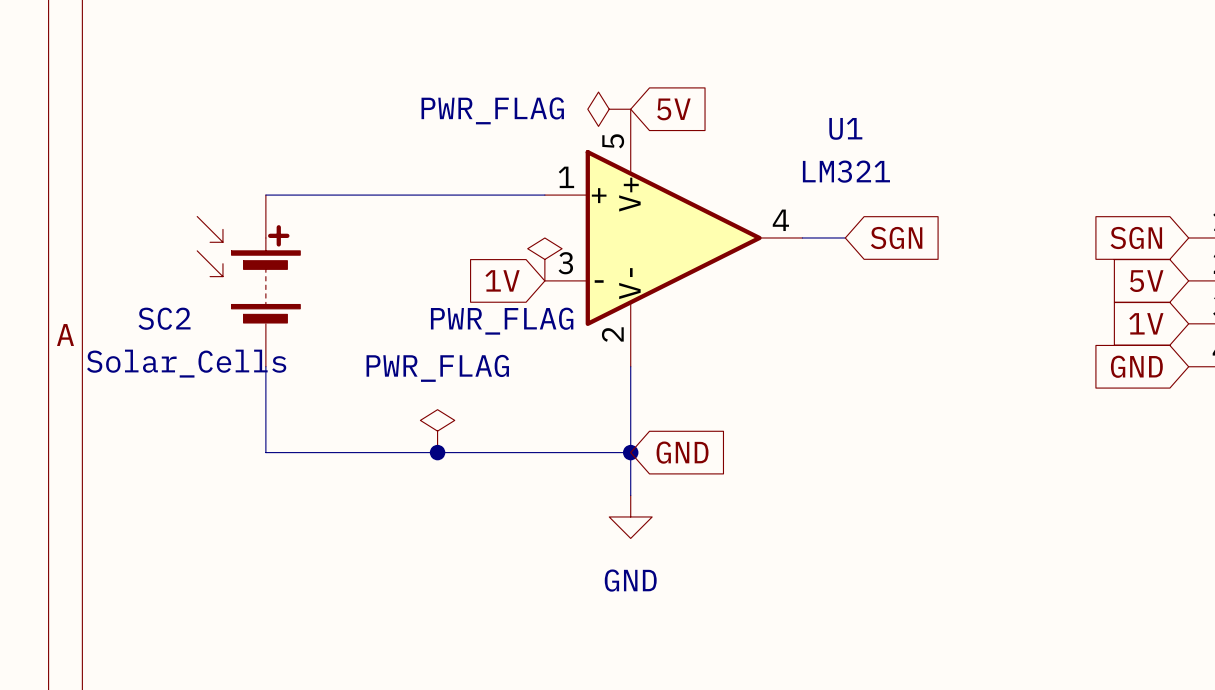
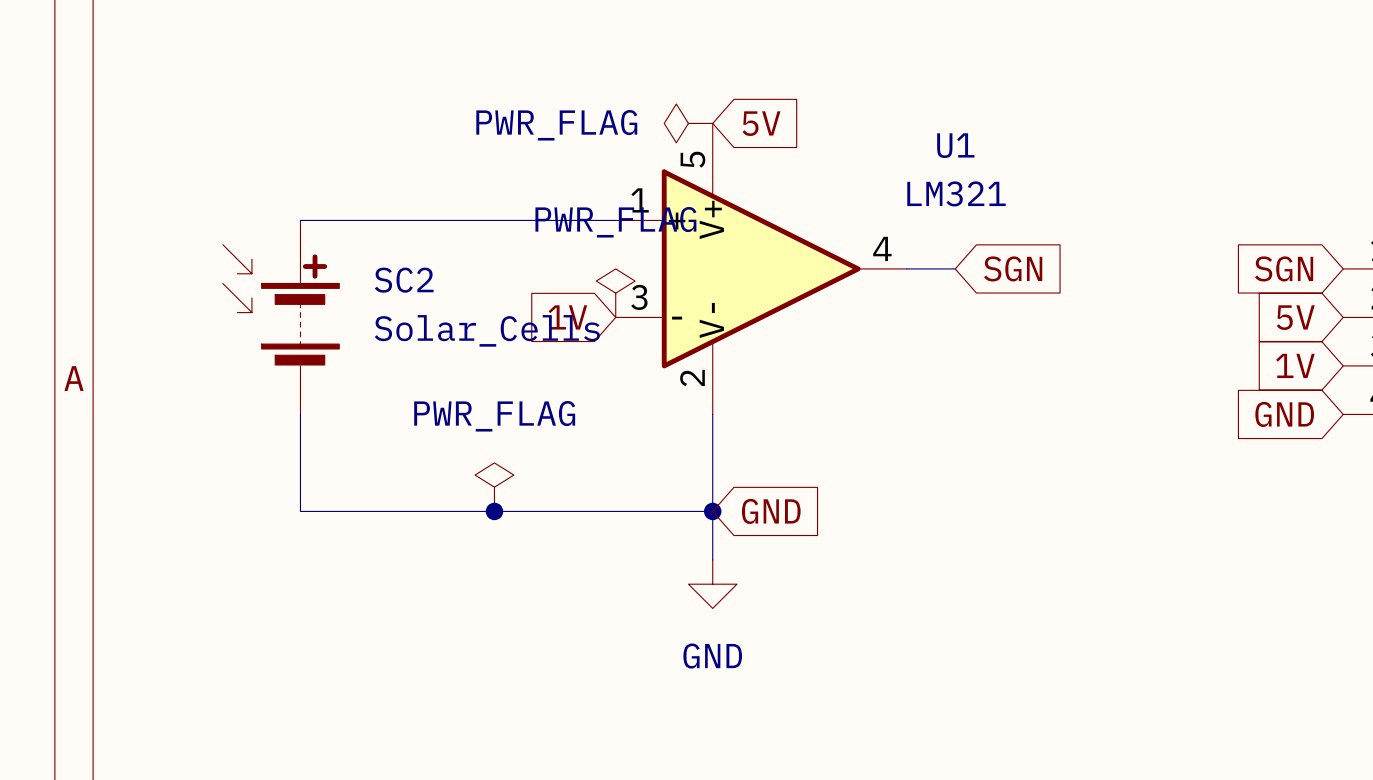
SC2 name position: SC2 (164, 318) -> SC2 (404, 280)
power symbol text position: PWR_FLAG (502, 321) -> PWR_FLAG (615, 222)
SC2 value position: Solar_Cells (186, 363) -> Solar_Cells (487, 330)

